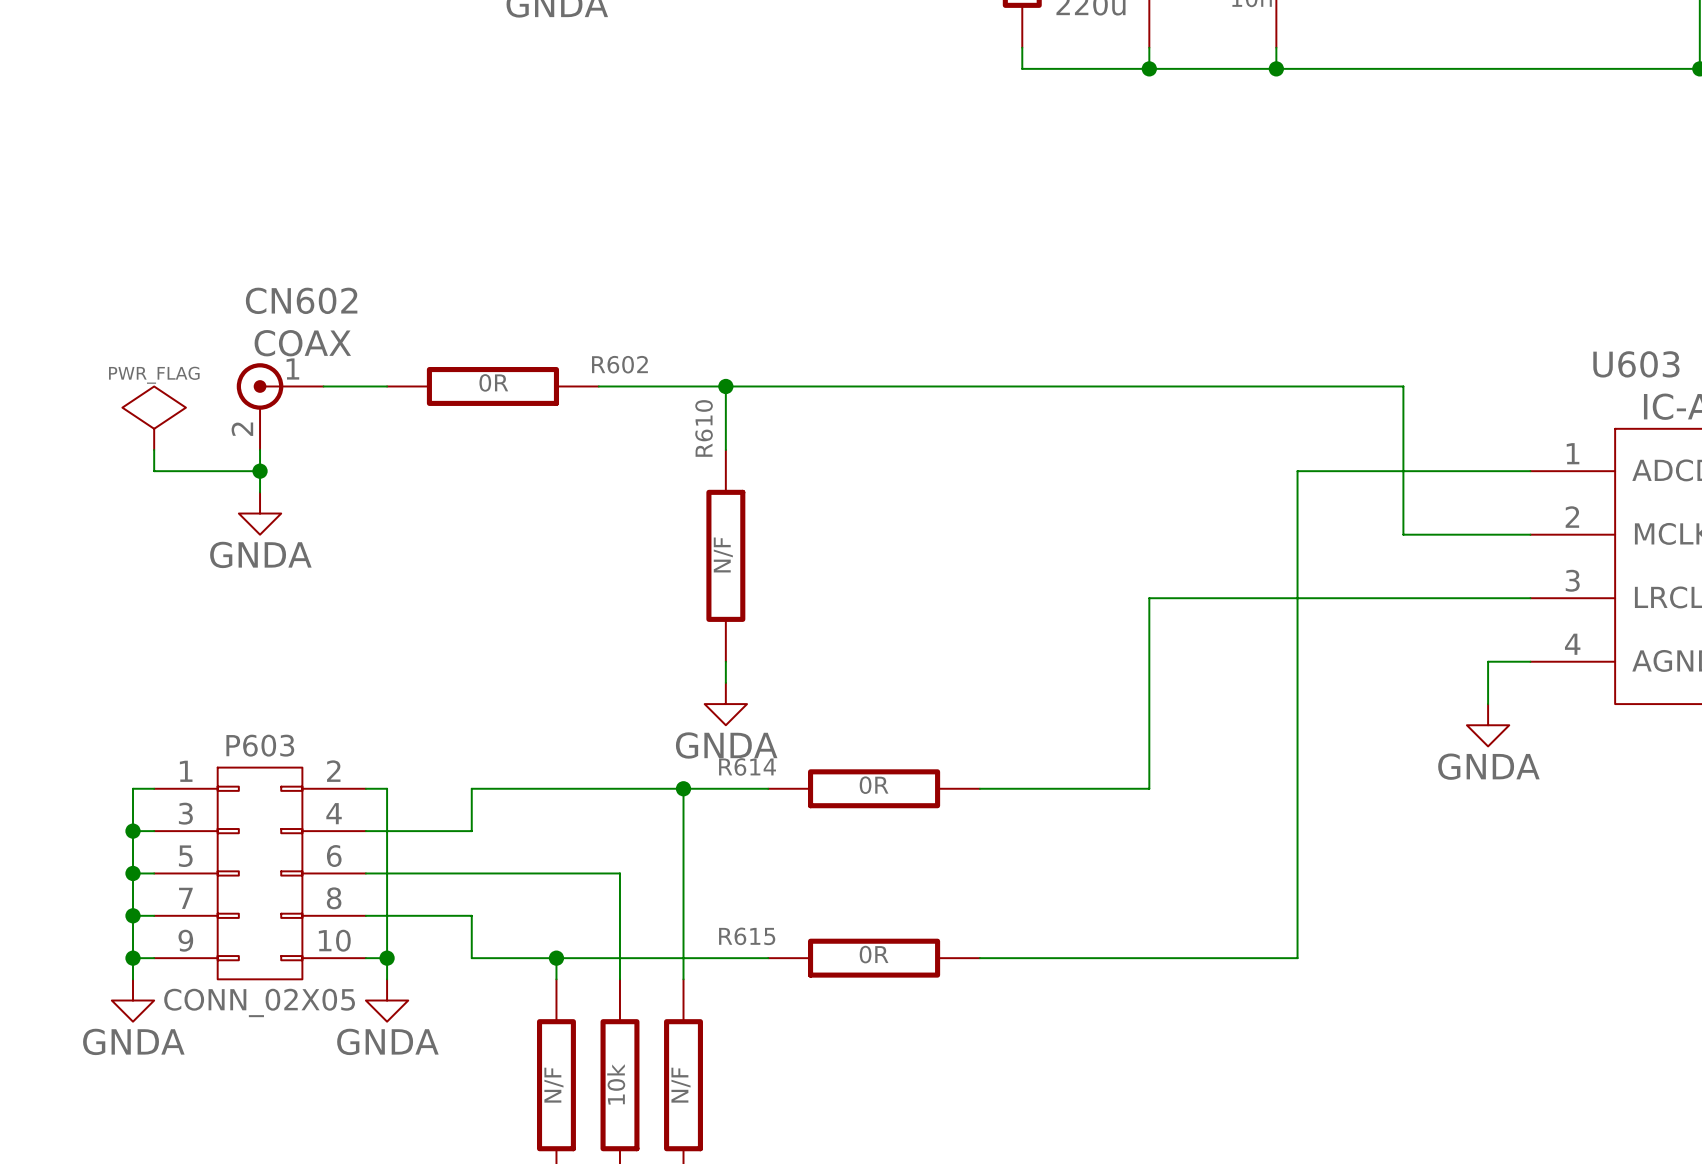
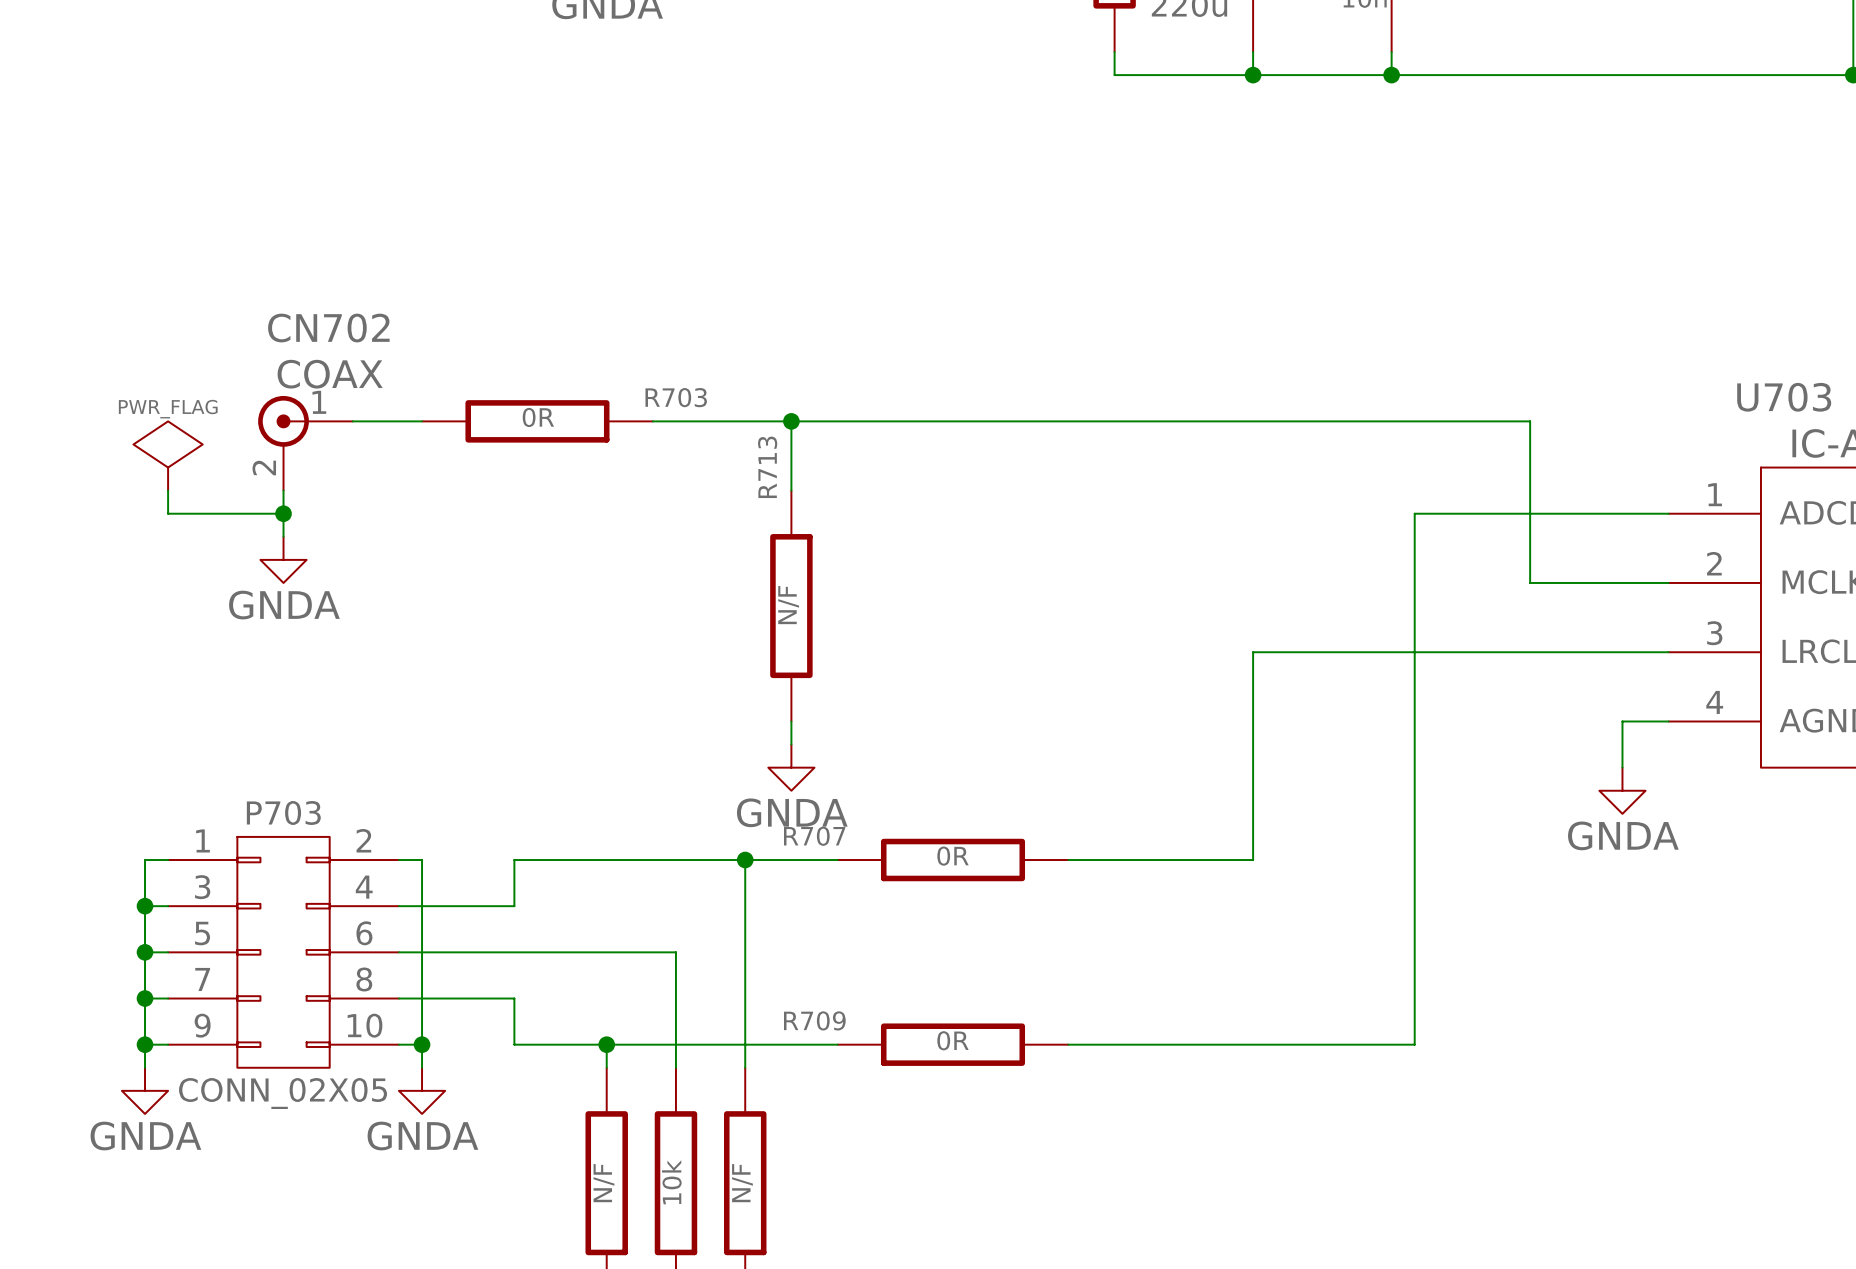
CN602 name: CN602 (301, 300) -> CN702 (328, 328)
R602 name: R602 (619, 364) -> R703 (676, 397)
U603 name: U603 (1636, 364) -> U703 (1784, 397)
R610 name: R610 (704, 428) -> R713 (767, 467)
P603 name: P603 (260, 745) -> P703 (283, 812)
R614 name: R614 (747, 766) -> R707 (814, 836)
R615 name: R615 (747, 936) -> R709 (814, 1020)

